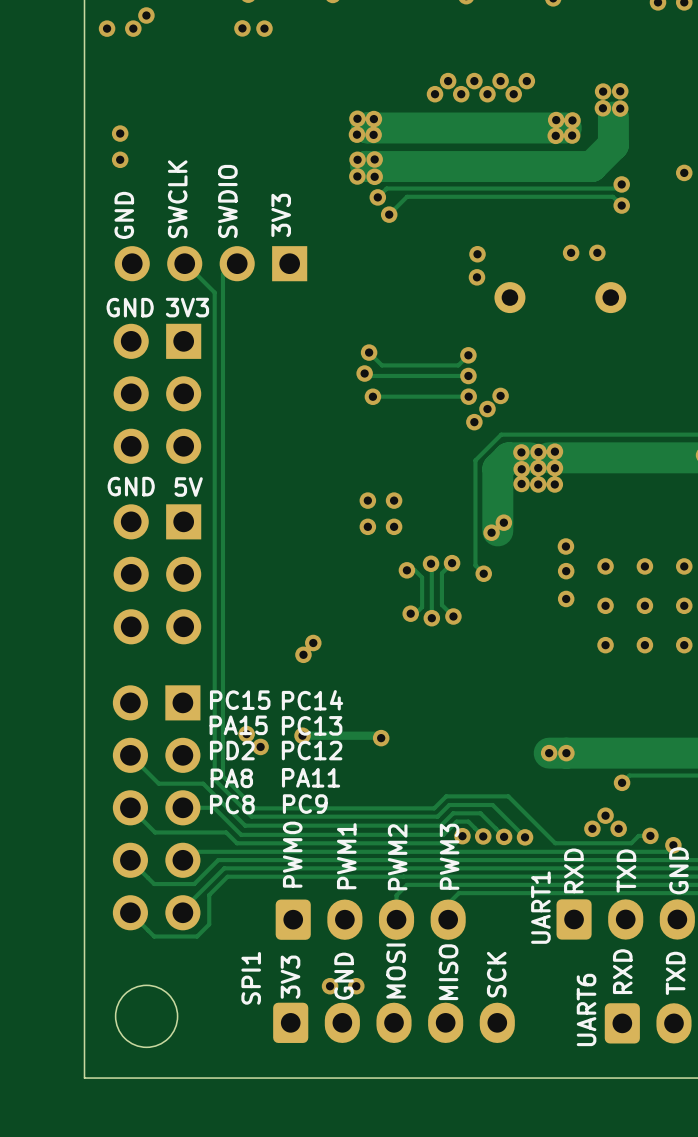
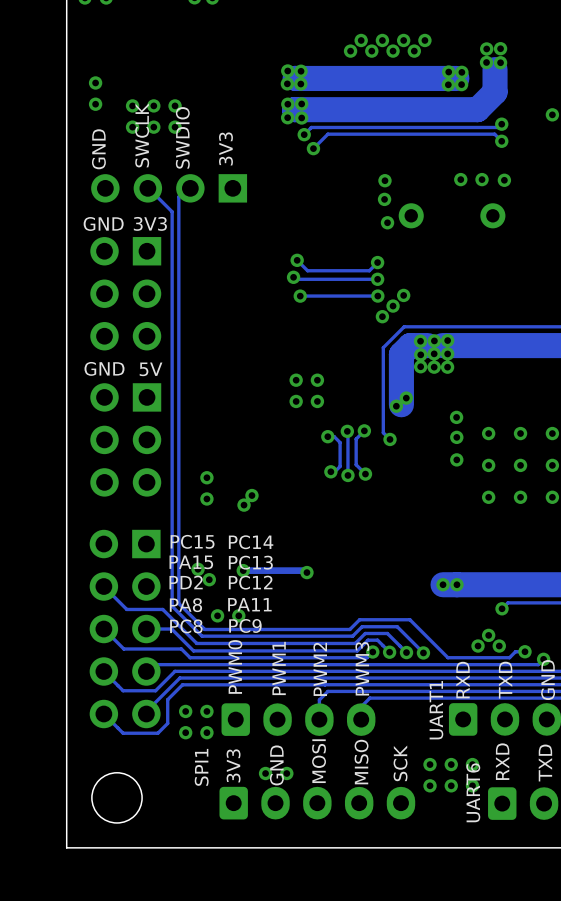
via: none -> (132, 105)
via: none -> (153, 105)
via: none -> (175, 105)
via: none -> (132, 127)
via: none -> (153, 127)
via: none -> (175, 127)
via: none -> (504, 180)
via: none -> (387, 222)
via: none -> (206, 477)
via: none -> (206, 498)
via: none -> (217, 615)
via: none -> (238, 615)
via: none -> (185, 711)
via: none -> (206, 711)
via: none -> (185, 732)
via: none -> (206, 732)
via: none -> (430, 764)
via: none -> (451, 764)
via: none -> (472, 764)
via: none -> (430, 785)
via: none -> (451, 785)
via: none -> (472, 785)

